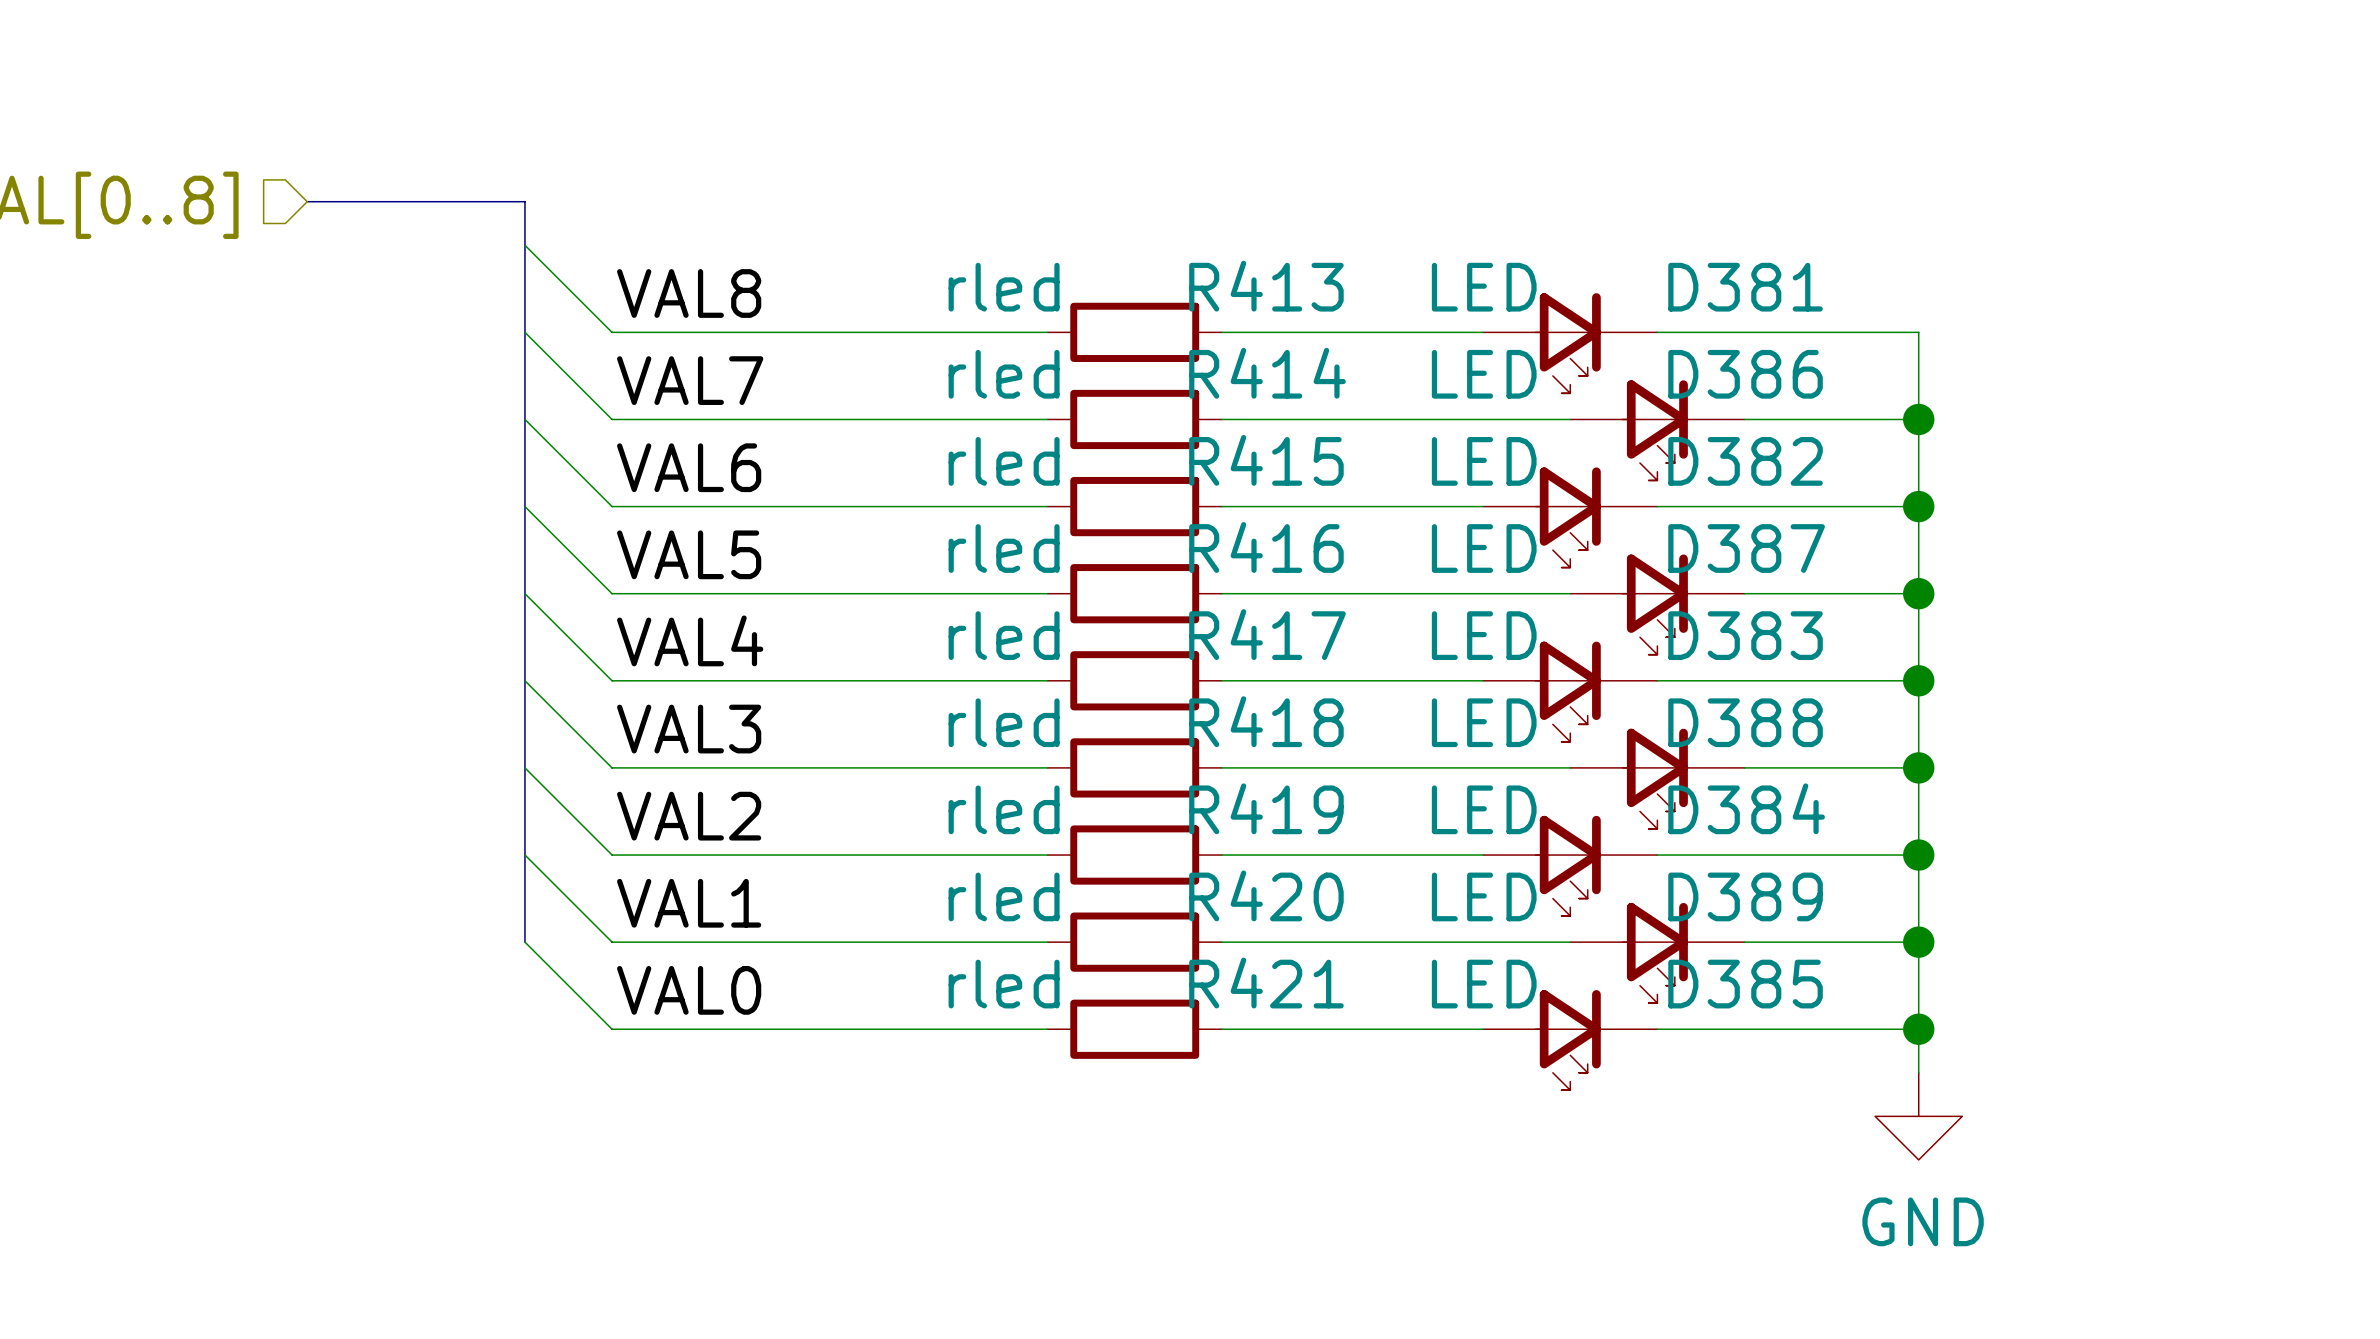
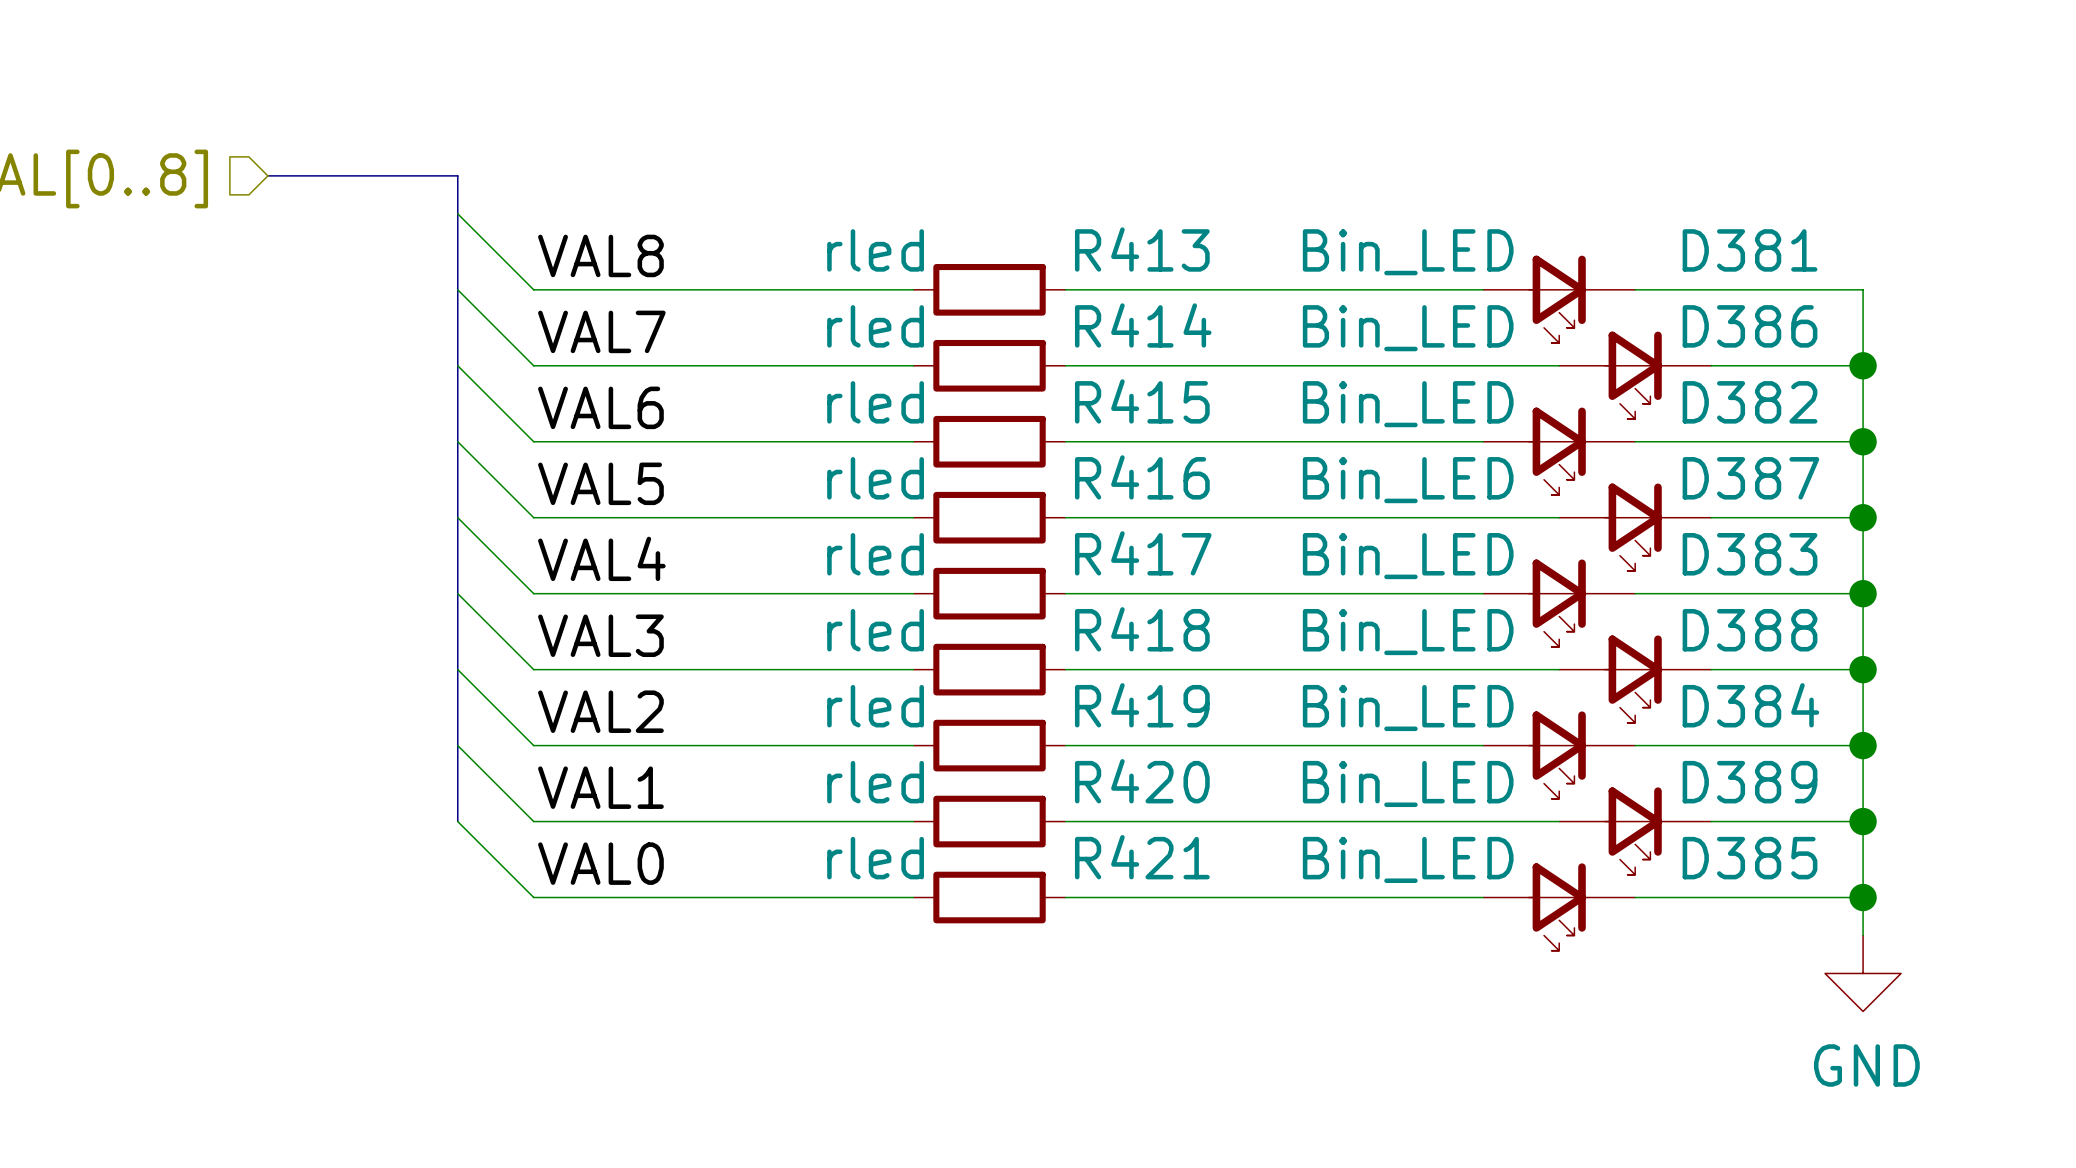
R413 name position: R413 (1266, 286) -> R413 (1142, 249)
D381 value: LED (1484, 287) -> Bin_LED (1408, 252)
D381 name position: D381 (1745, 287) -> D381 (1750, 250)
wire: (1918, 332) (1918, 1072) -> (1673, 289) (1863, 289) (1863, 935)
D381 position: (1570, 343) -> (1559, 299)
R414 name position: R414 (1267, 373) -> R414 (1143, 325)
D386 value: LED (1484, 374) -> Bin_LED (1408, 328)
D386 name position: D386 (1745, 374) -> D386 (1750, 326)
junction: (1918, 419) -> none
wire: none -> (1711, 365) (1863, 365)
junction: none -> (1863, 365)
D386 position: (1657, 430) -> (1635, 375)
R415 name position: R415 (1266, 460) -> R415 (1142, 401)
D382 value: LED (1484, 461) -> Bin_LED (1408, 404)
D382 name position: D382 (1745, 461) -> D382 (1750, 402)
wire: none -> (1673, 441) (1863, 441)
junction: (1918, 506) -> none
junction: none -> (1863, 441)
D382 position: (1570, 517) -> (1559, 451)
R416 name position: R416 (1266, 547) -> R416 (1142, 477)
D387 value: LED (1484, 548) -> Bin_LED (1408, 480)
D387 name position: D387 (1746, 548) -> D387 (1750, 478)
junction: (1918, 593) -> none
wire: none -> (1711, 517) (1863, 517)
junction: none -> (1863, 517)
D387 position: (1657, 604) -> (1635, 527)
R417 name position: R417 (1267, 634) -> R417 (1143, 553)
D383 value: LED (1484, 635) -> Bin_LED (1408, 556)
D383 name position: D383 (1745, 635) -> D383 (1750, 554)
wire: none -> (1673, 593) (1863, 593)
junction: (1918, 680) -> none
junction: none -> (1863, 593)
D383 position: (1570, 691) -> (1559, 603)
R418 name position: R418 (1266, 721) -> R418 (1142, 629)
D388 value: LED (1484, 722) -> Bin_LED (1408, 632)
D388 name position: D388 (1745, 722) -> D388 (1750, 630)
junction: (1918, 767) -> none
wire: none -> (1711, 669) (1863, 669)
junction: none -> (1863, 669)
D388 position: (1657, 778) -> (1635, 679)
R419 name position: R419 (1266, 808) -> R419 (1142, 705)
D384 name position: D384 (1746, 808) -> D384 (1750, 705)
D384 value: LED (1484, 809) -> Bin_LED (1408, 708)
wire: none -> (1673, 745) (1863, 745)
junction: (1918, 855) -> none
junction: none -> (1863, 745)
D384 position: (1570, 865) -> (1559, 755)
R420 name position: R420 (1266, 895) -> R420 (1142, 781)
D389 value: LED (1484, 896) -> Bin_LED (1408, 783)
D389 name position: D389 (1745, 896) -> D389 (1750, 782)
junction: (1918, 942) -> none
wire: none -> (1711, 821) (1863, 821)
junction: none -> (1863, 821)
D389 position: (1657, 953) -> (1635, 831)
R421 name position: R421 (1266, 983) -> R421 (1142, 857)
D385 value: LED (1484, 984) -> Bin_LED (1408, 859)
D385 name position: D385 (1745, 984) -> D385 (1750, 858)
wire: none -> (1673, 897) (1863, 897)
junction: (1918, 1029) -> none
junction: none -> (1863, 897)
D385 position: (1570, 1040) -> (1559, 907)
power symbol position: GND (1918, 1116) -> GND (1863, 973)

